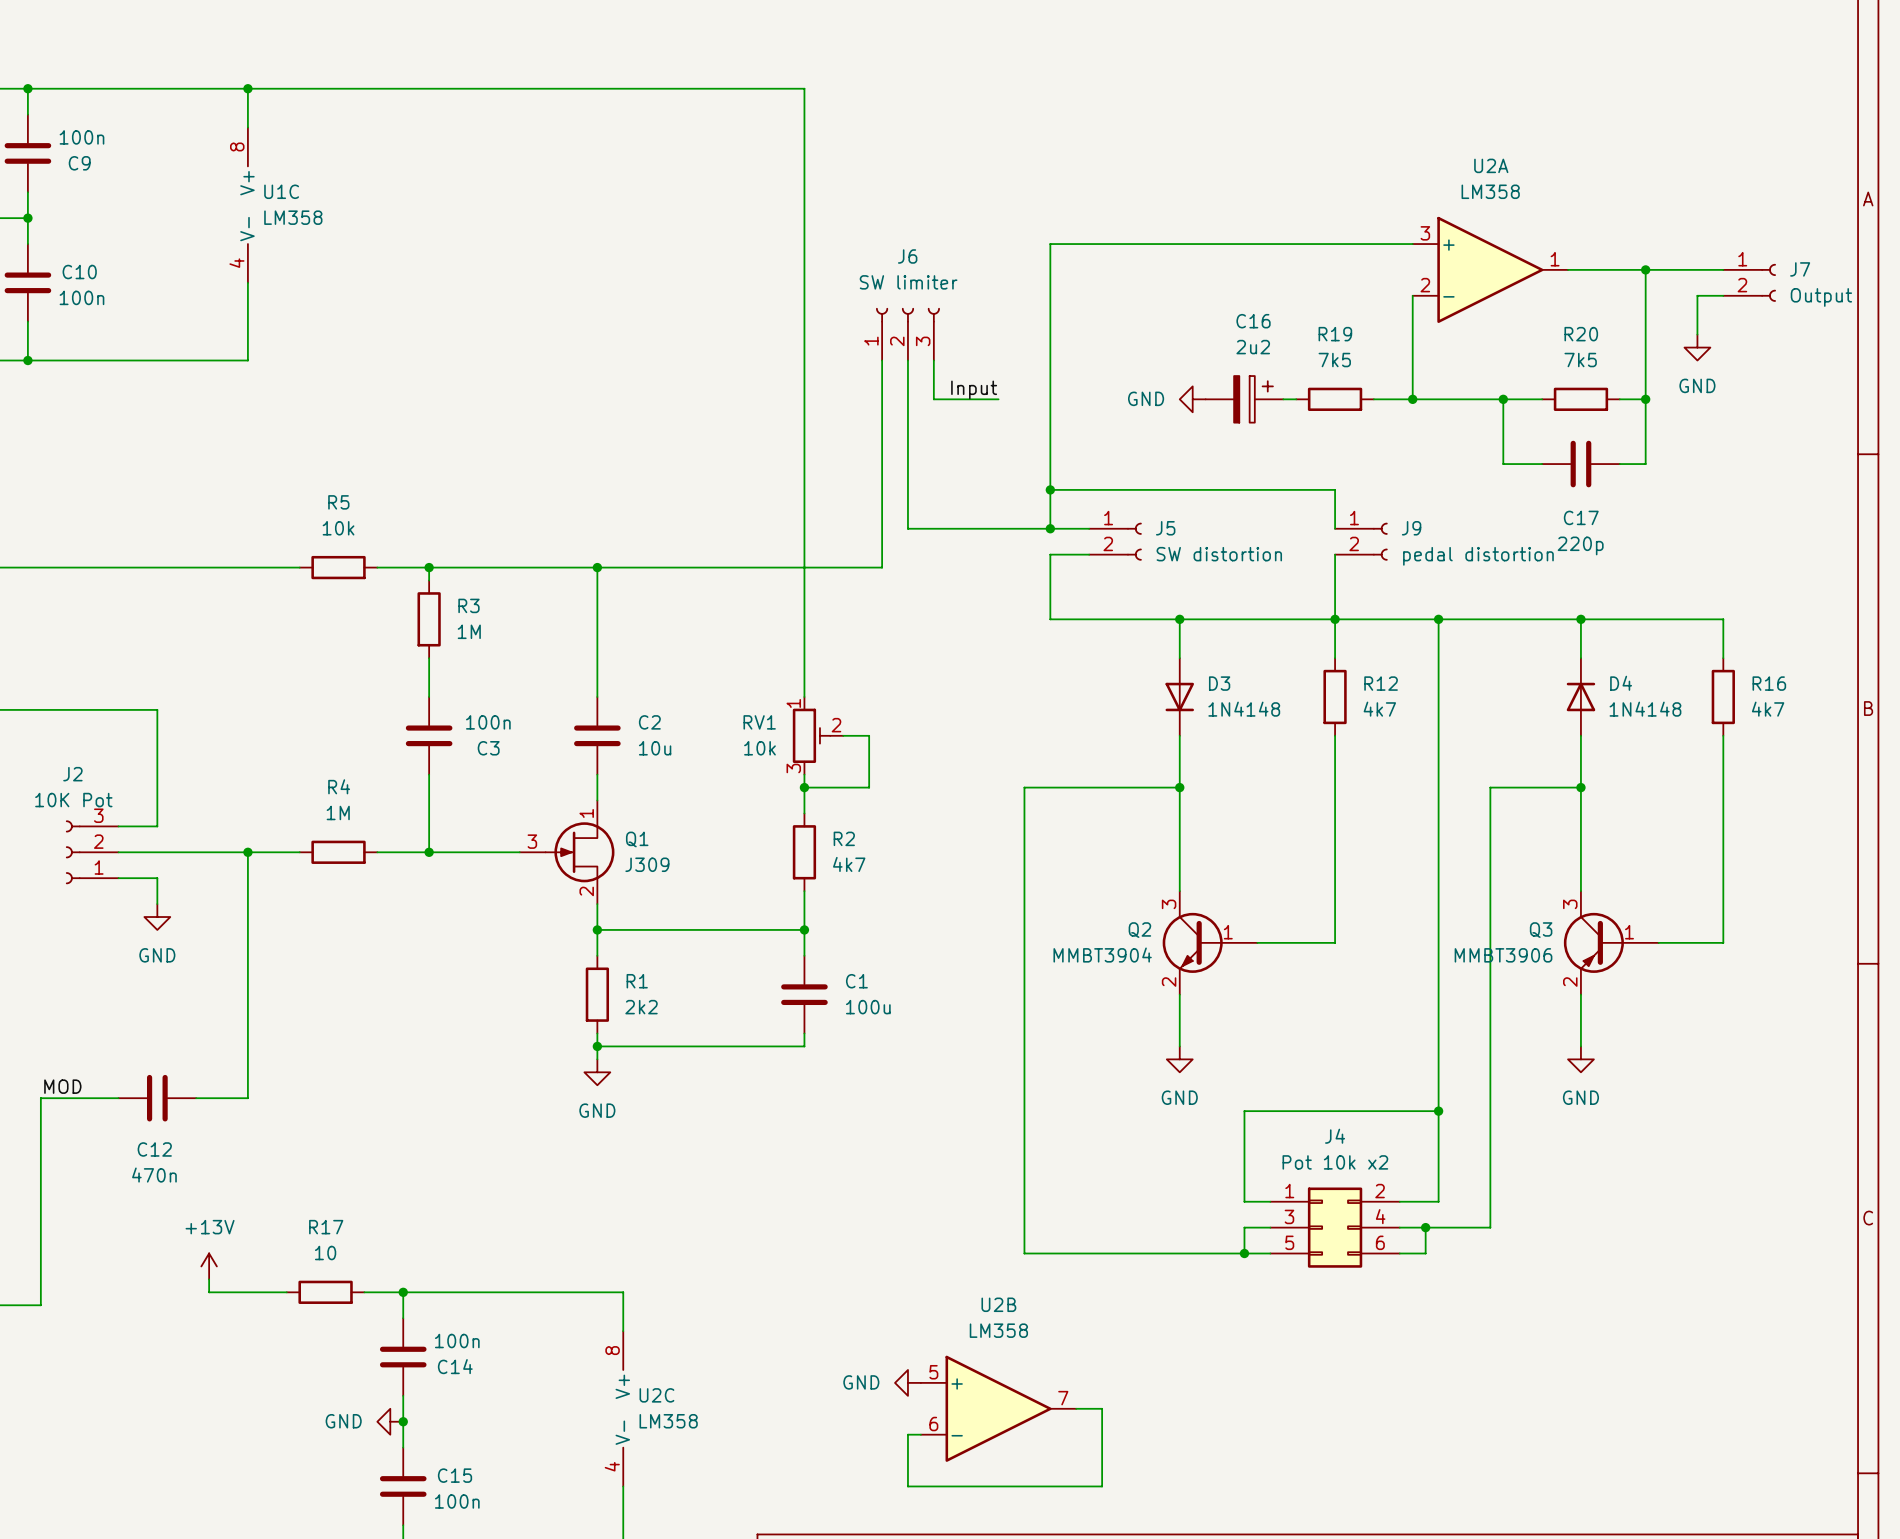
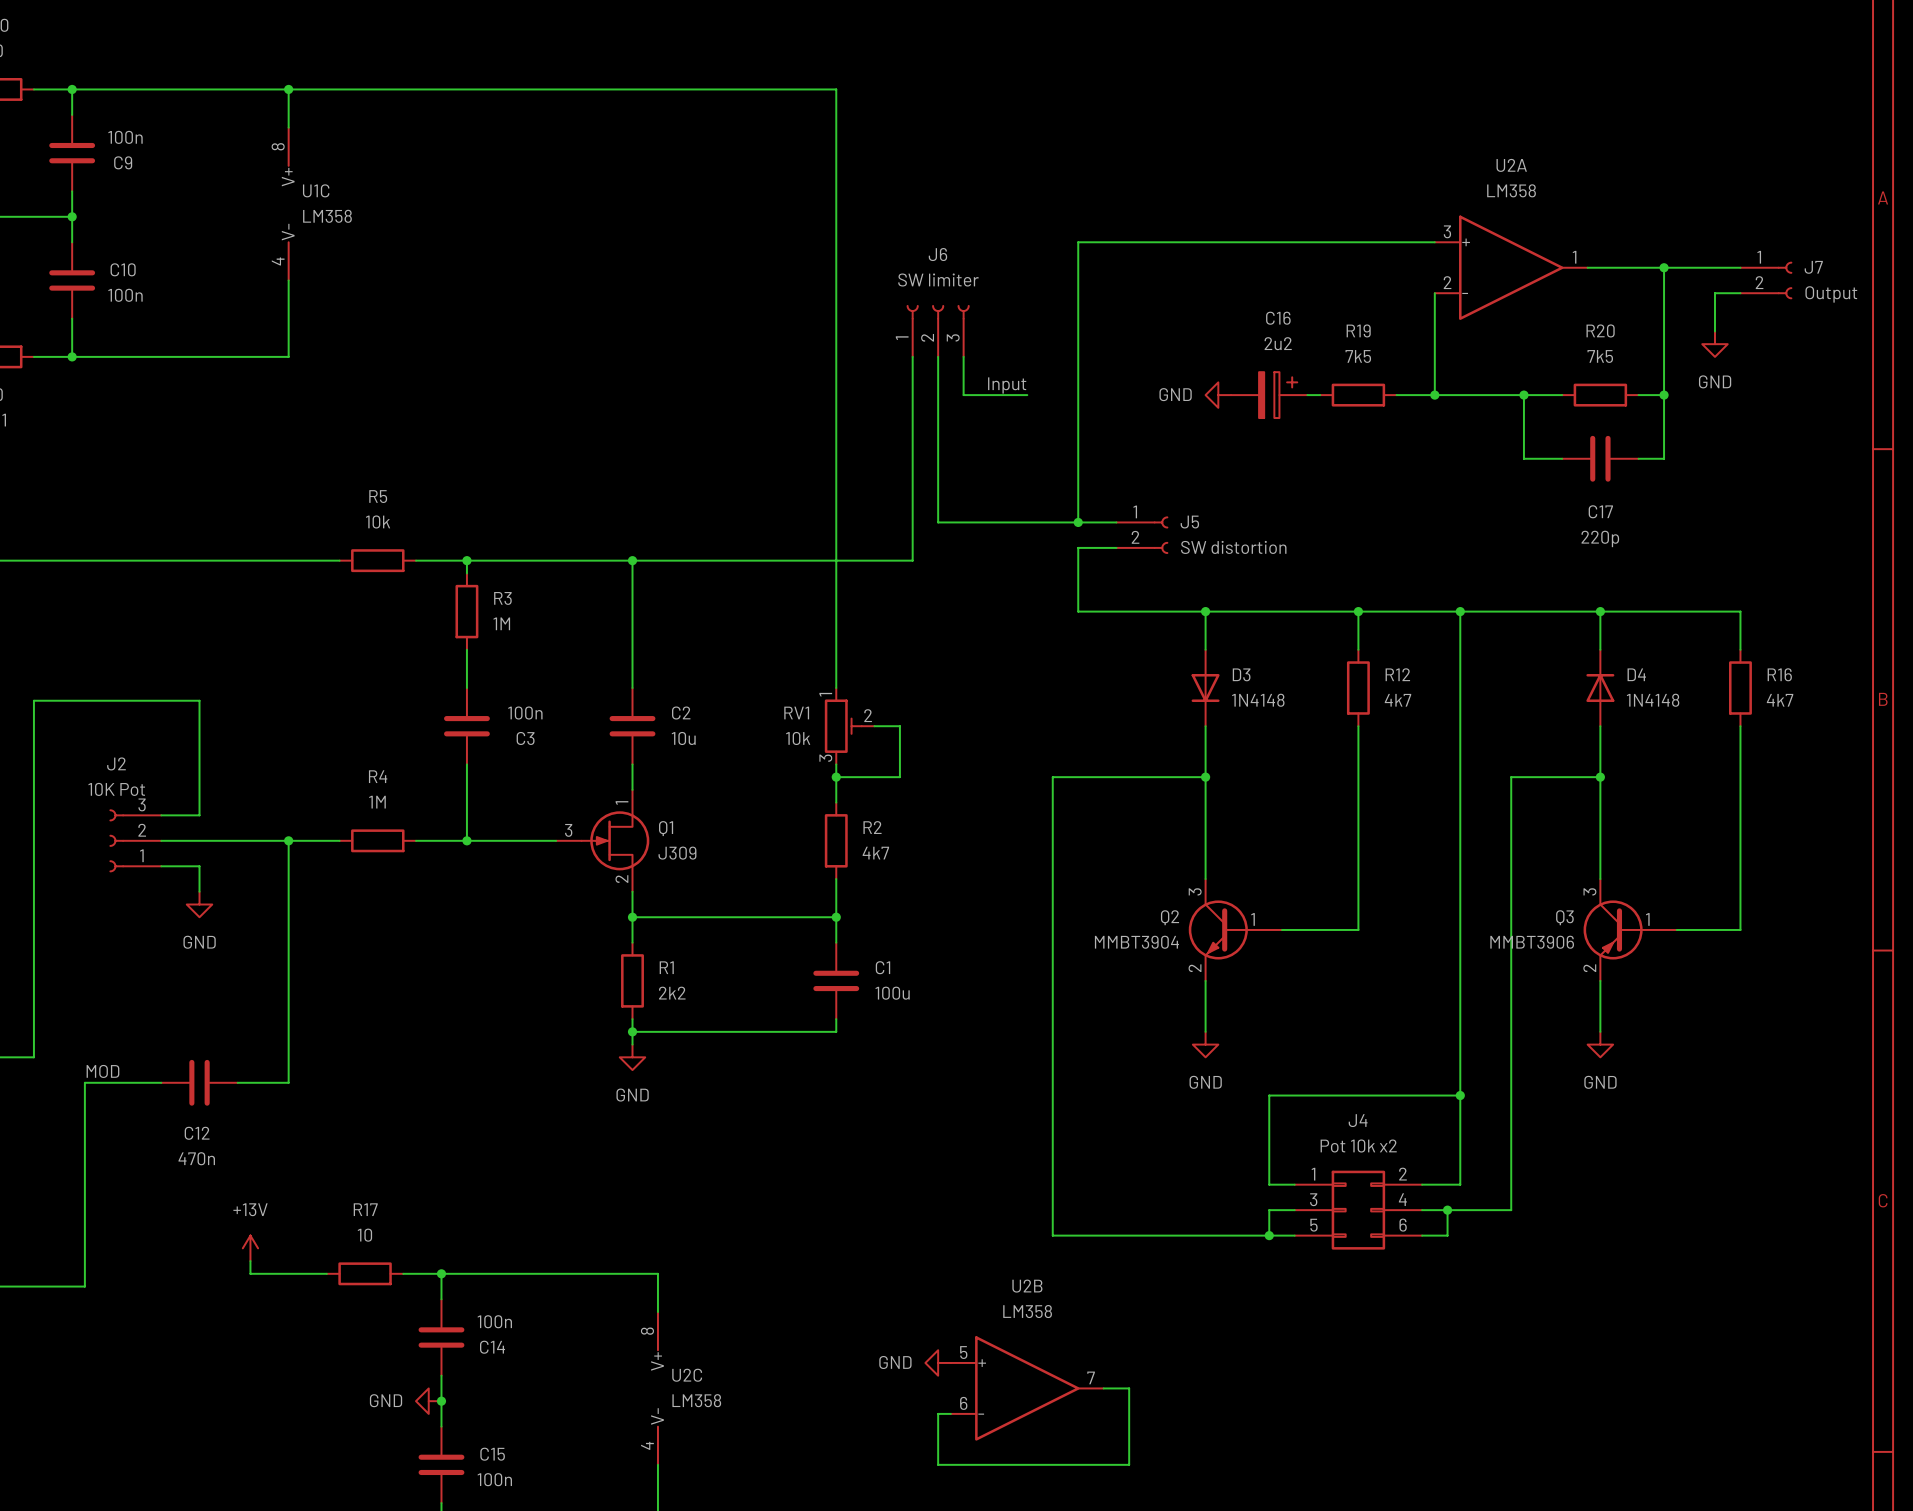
wire: (1050, 489) (1335, 489) (1335, 528) -> none
junction: (1050, 489) -> none
J9: pedal distortion (1361, 541) -> none
wire: (1335, 554) (1335, 619) -> none

